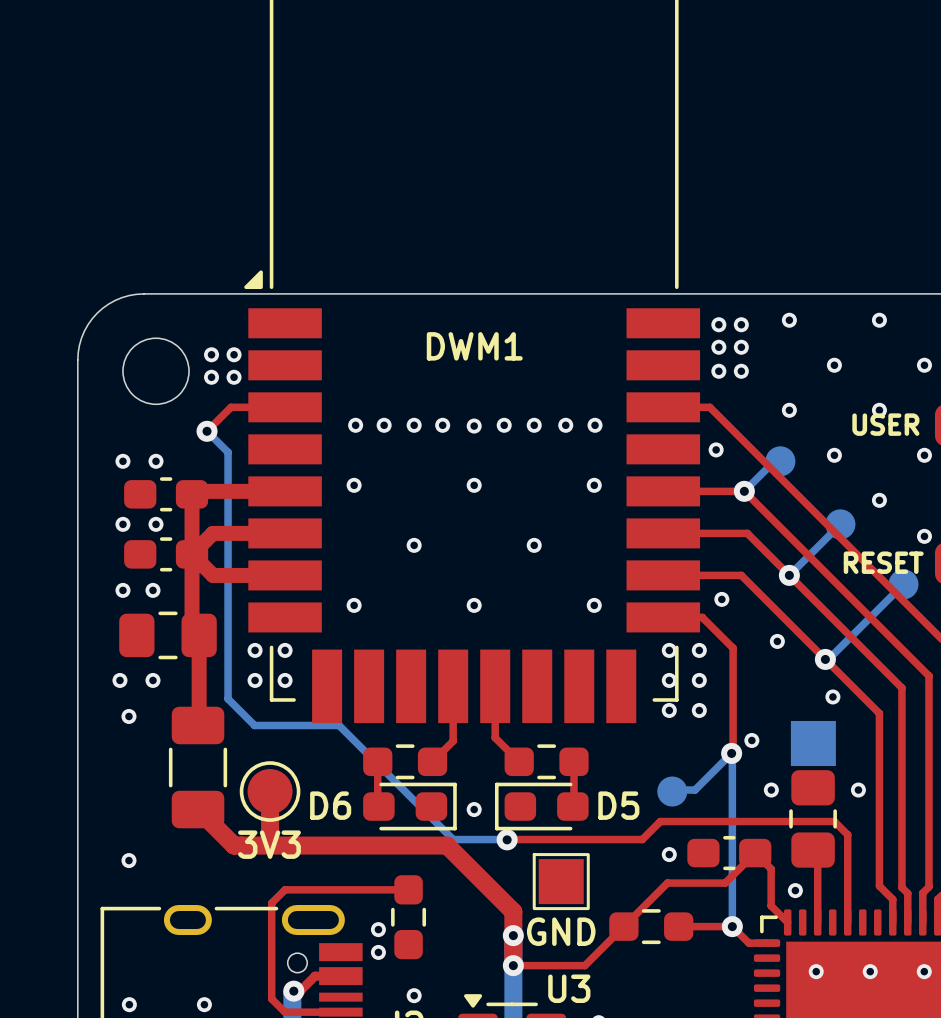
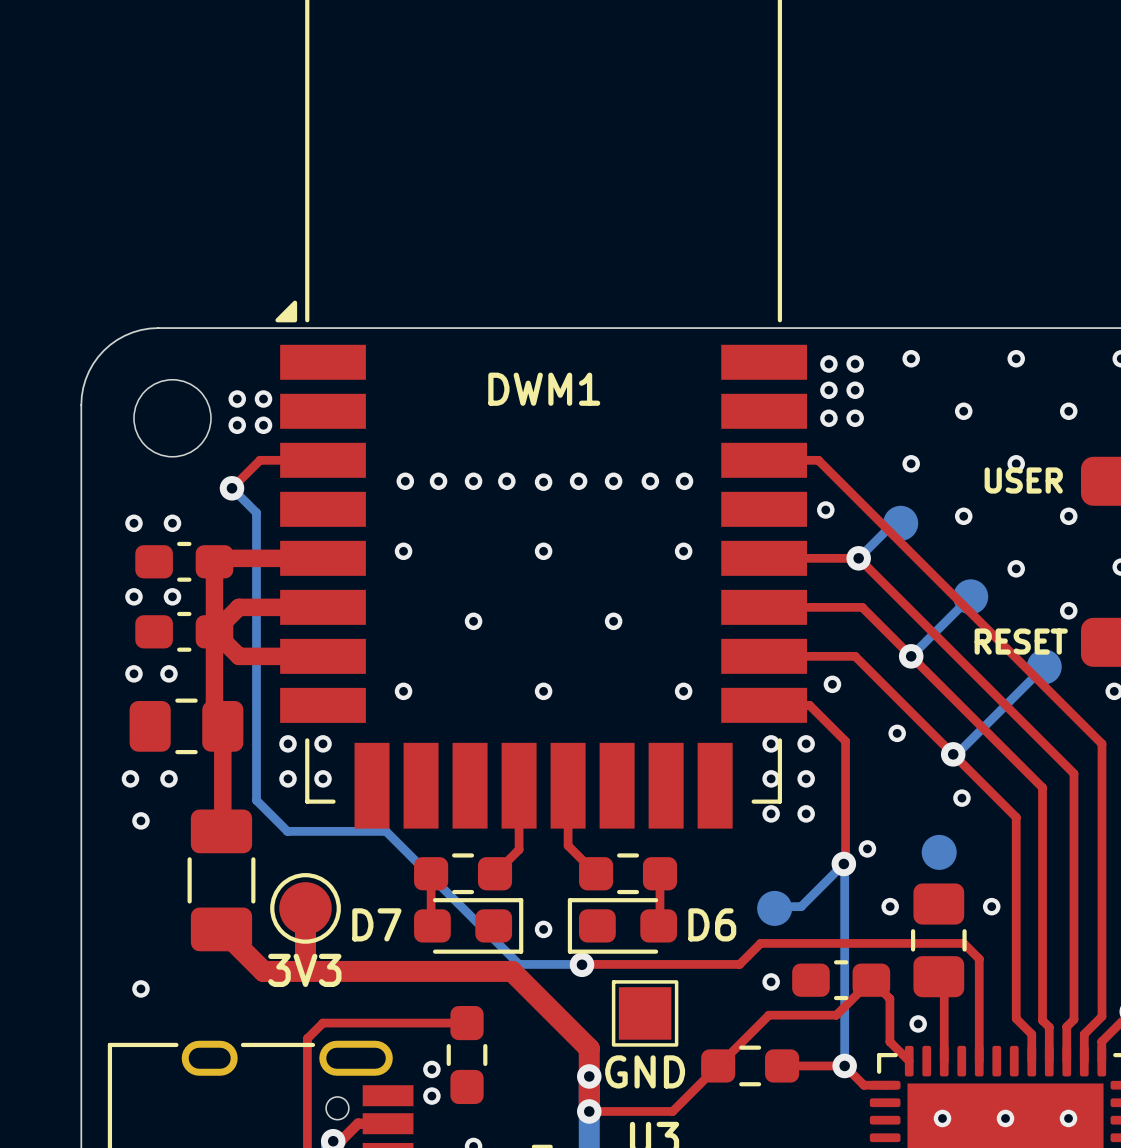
part footprint: [790, 720, 836, 767] -> [921, 834, 957, 870]
D6 name: D6 (330, 805) -> D7 (376, 924)
D5 name: D5 (618, 805) -> D6 (712, 924)

